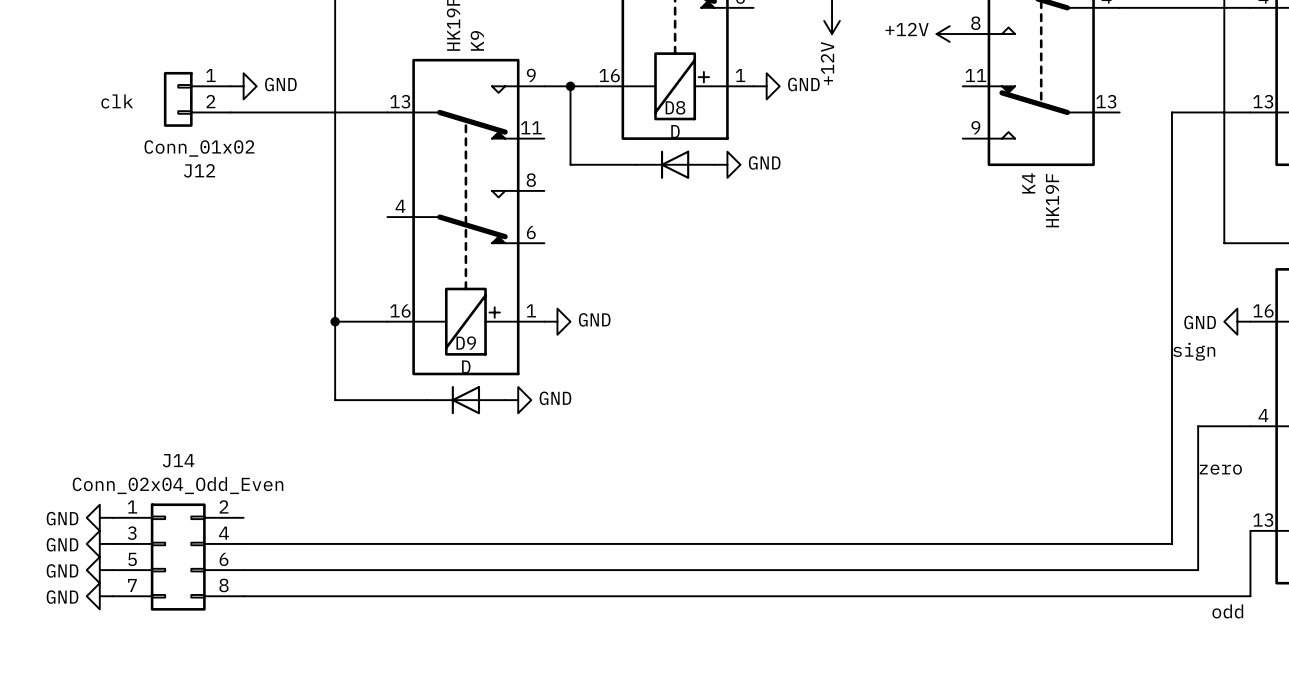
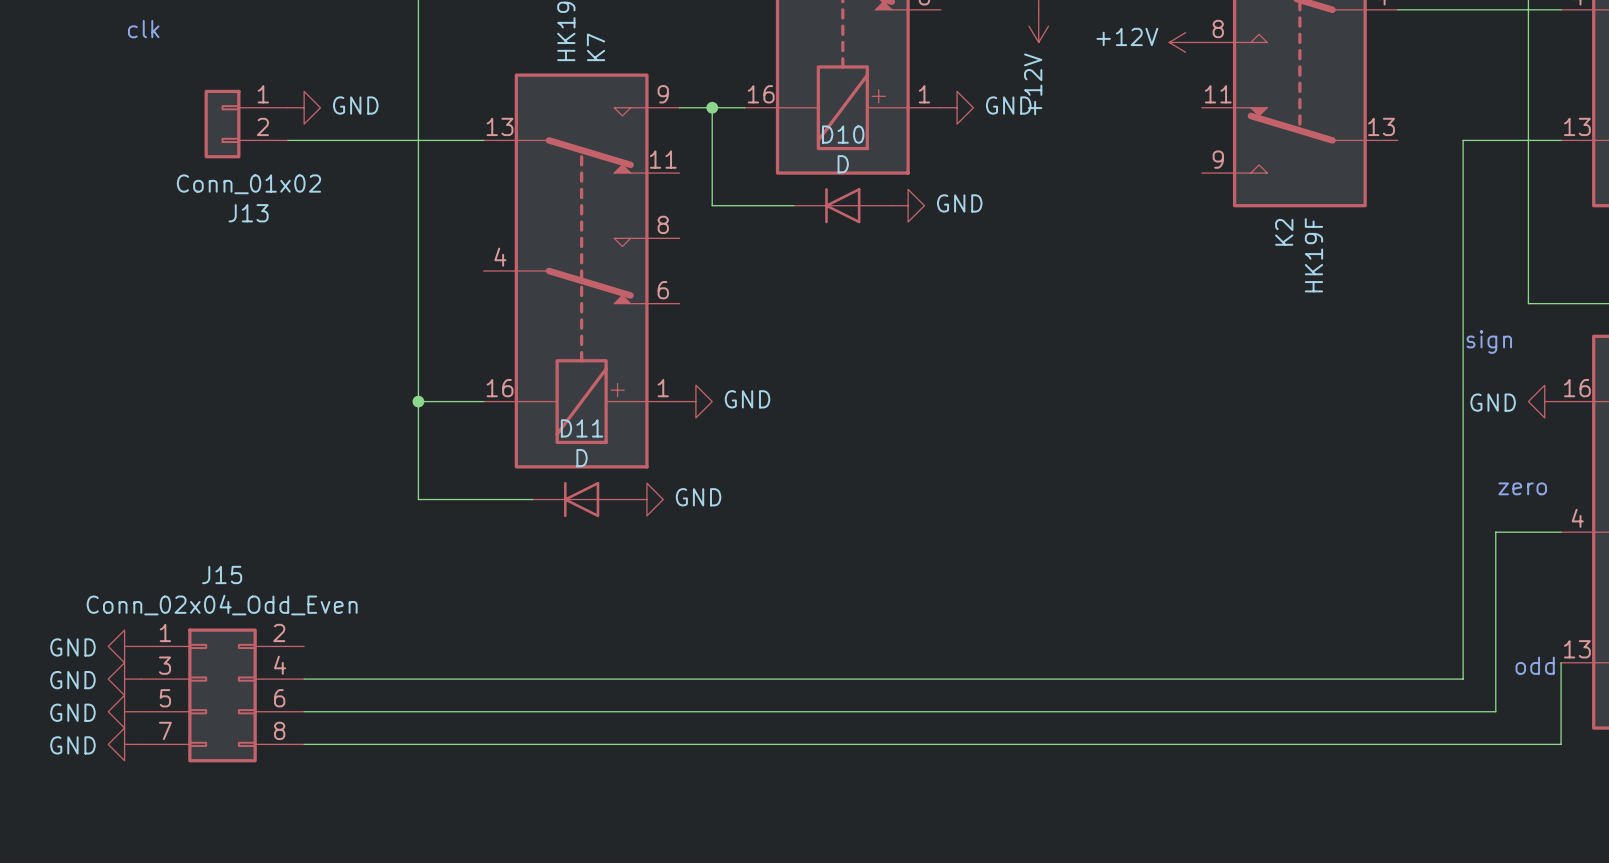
K9 name: K9 (477, 40) -> K7 (596, 47)
text position: clk (117, 101) -> clk (143, 29)
D8 name: D8 (675, 107) -> D10 (843, 134)
J12 name: J12 (199, 170) -> J13 (248, 213)
K4 name: K4 (1028, 183) -> K2 (1284, 232)
D9 name: D9 (466, 343) -> D11 (582, 428)
text position: sign (1194, 351) -> sign (1489, 341)
J14 name: J14 (178, 460) -> J15 (222, 574)
text position: zero (1220, 469) -> zero (1522, 488)
text position: odd (1227, 611) -> odd (1535, 665)

